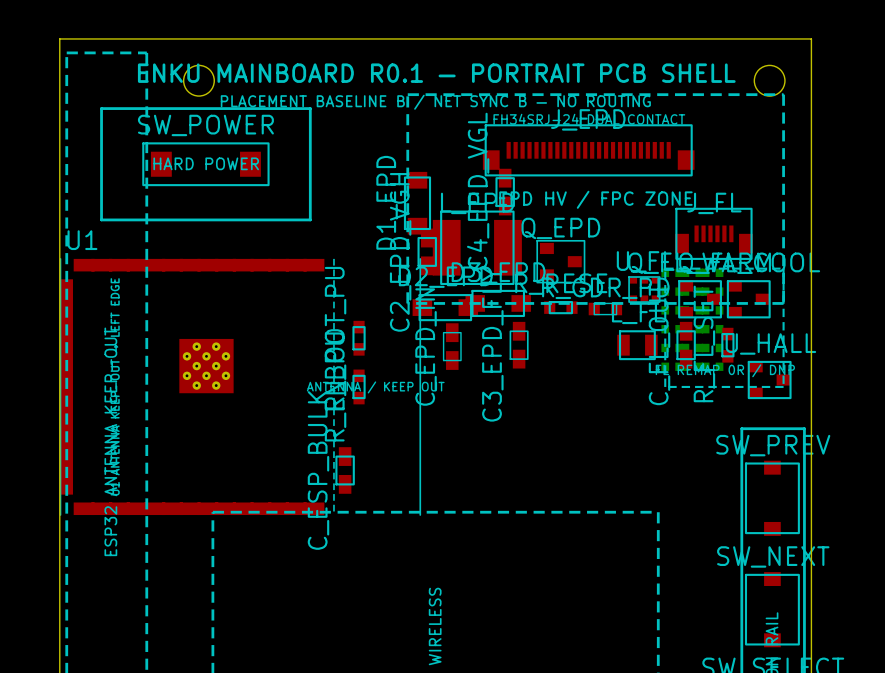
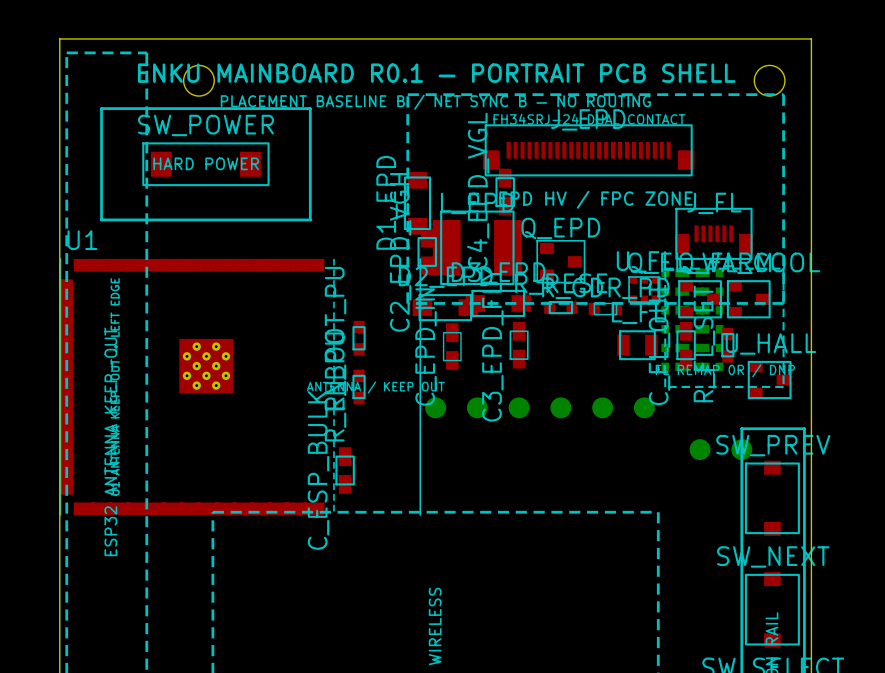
part: none -> (435, 407)
part: none -> (477, 407)
part: none -> (519, 407)
part: none -> (560, 407)
part: none -> (602, 407)
part: none -> (644, 407)
part: none -> (700, 449)
part: none -> (741, 449)

